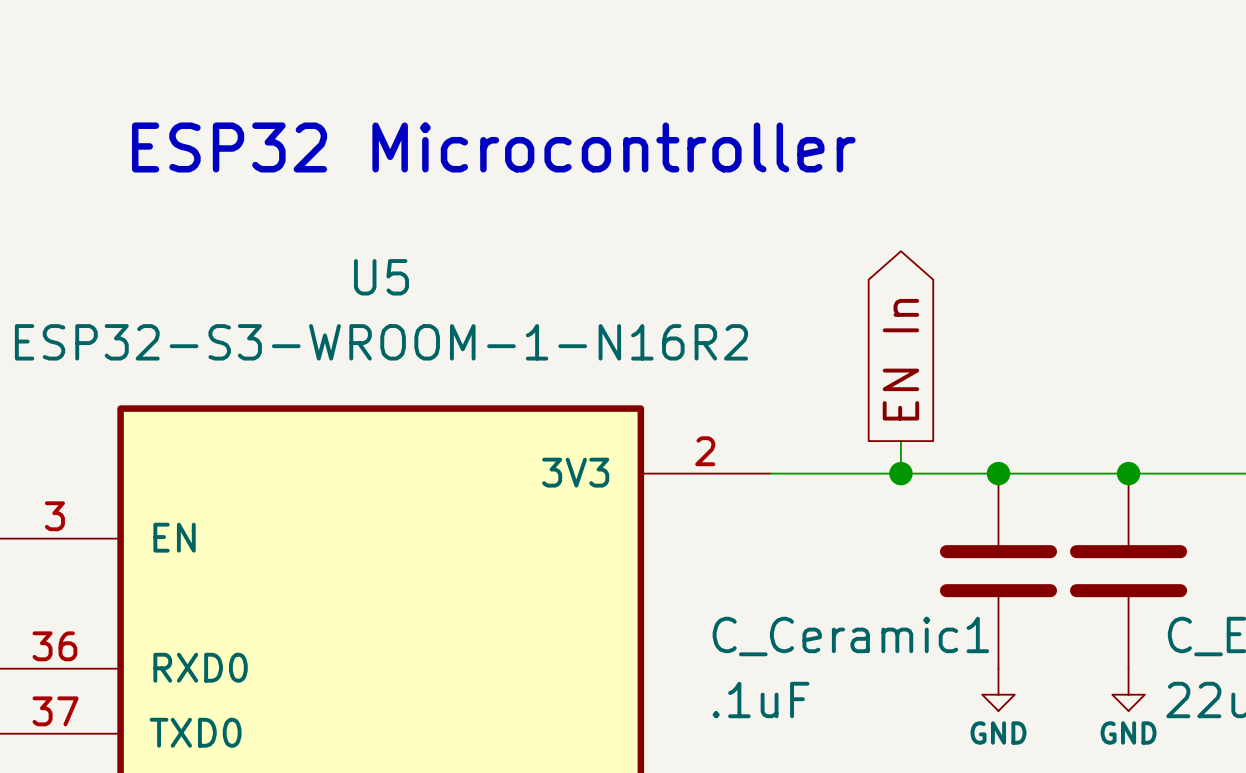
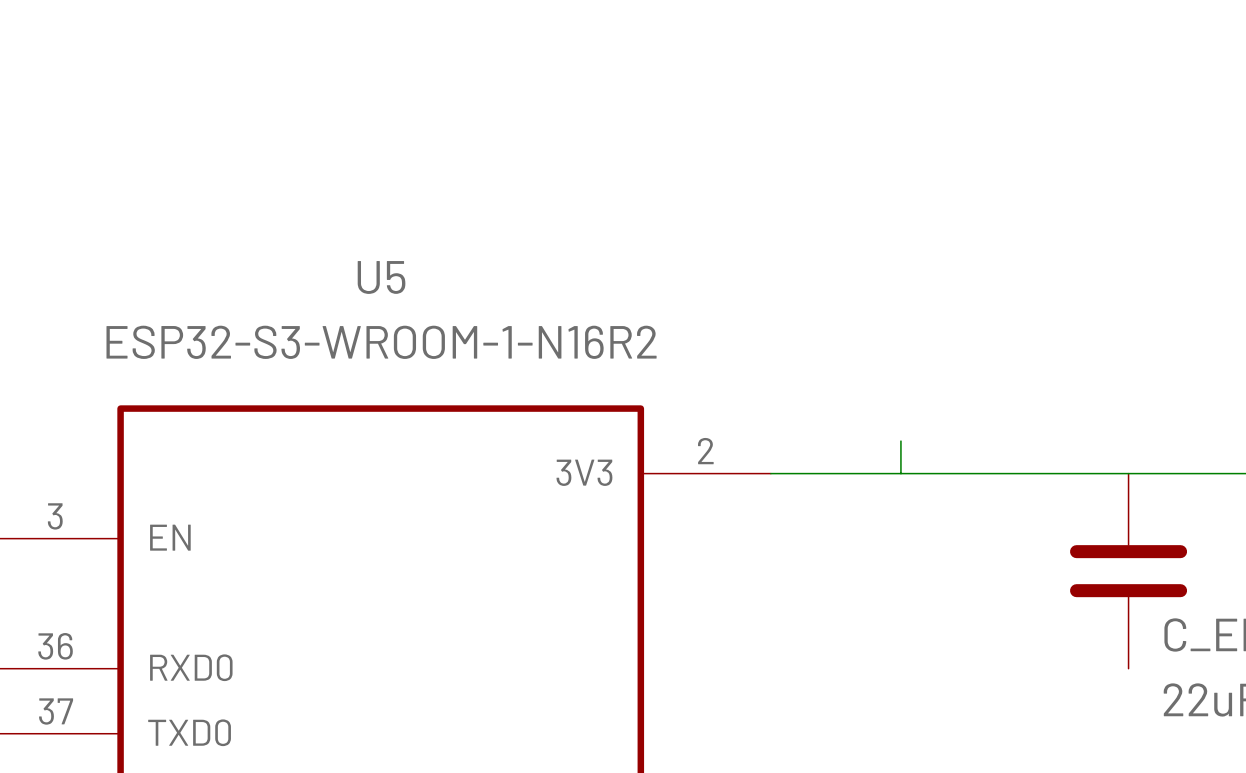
text: ESP32 Microcontroller (493, 147) -> none
global label: EN In (900, 359) -> none
junction: (900, 473) -> none
junction: (998, 473) -> none
junction: (1128, 473) -> none
C_Ceramic1: .1uF (998, 571) -> none
power symbol: GND (998, 689) -> none
power symbol: GND (1128, 689) -> none

